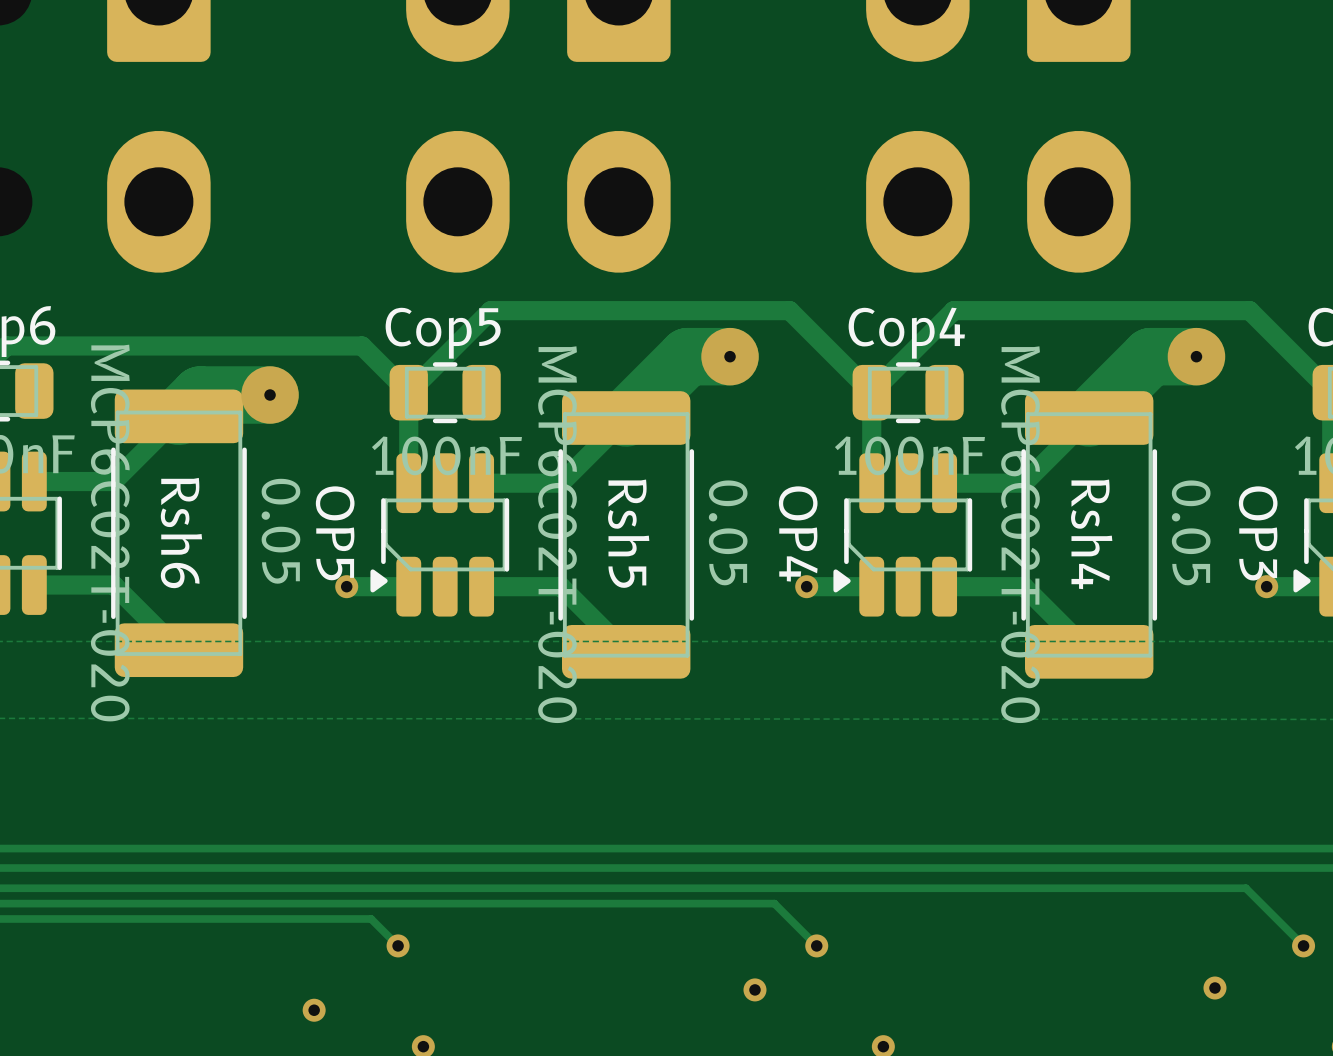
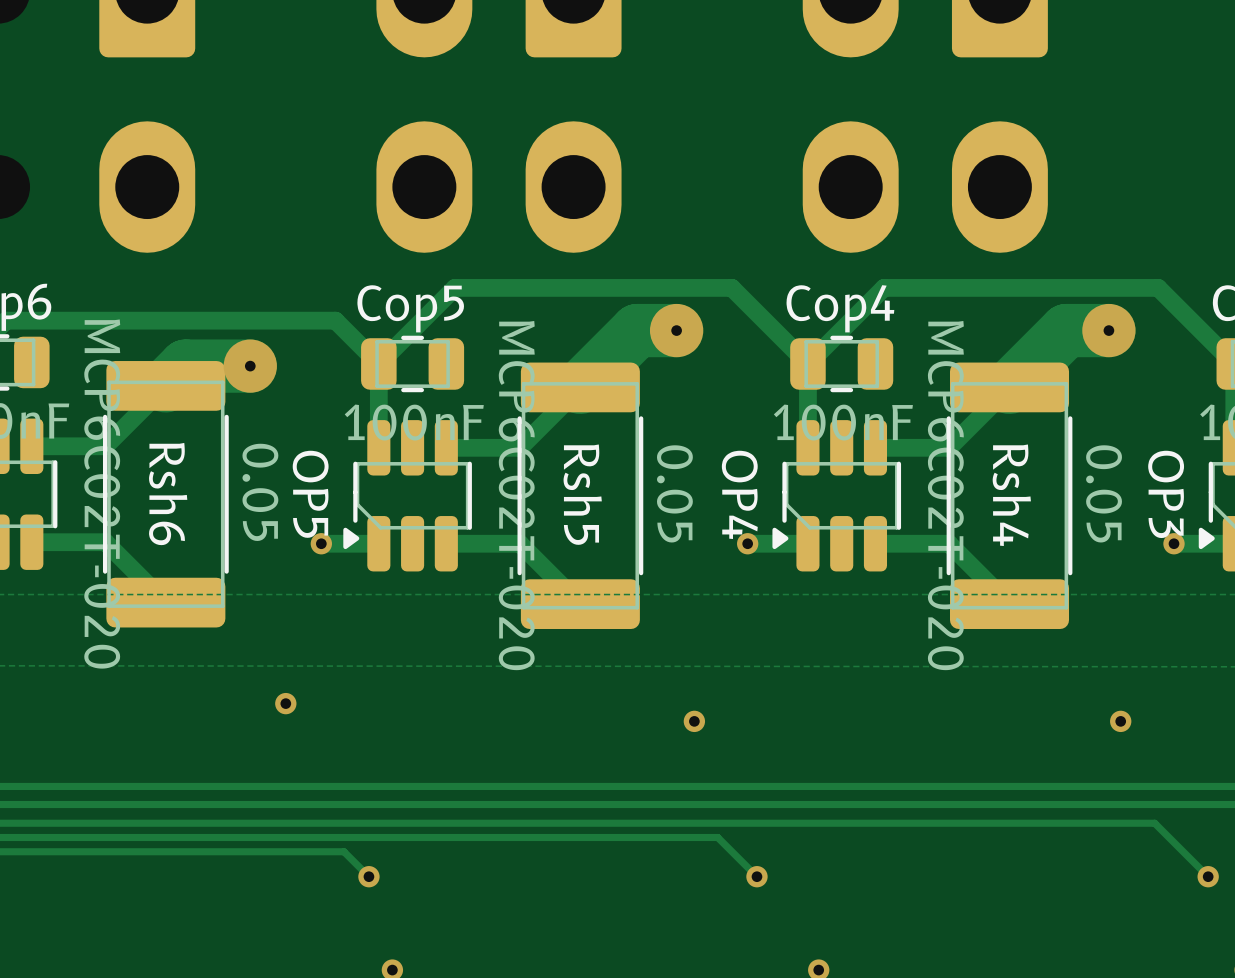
via: none -> (285, 703)
via position: (1214, 988) -> (1120, 721)
via position: (754, 989) -> (694, 721)
via: (314, 1010) -> none

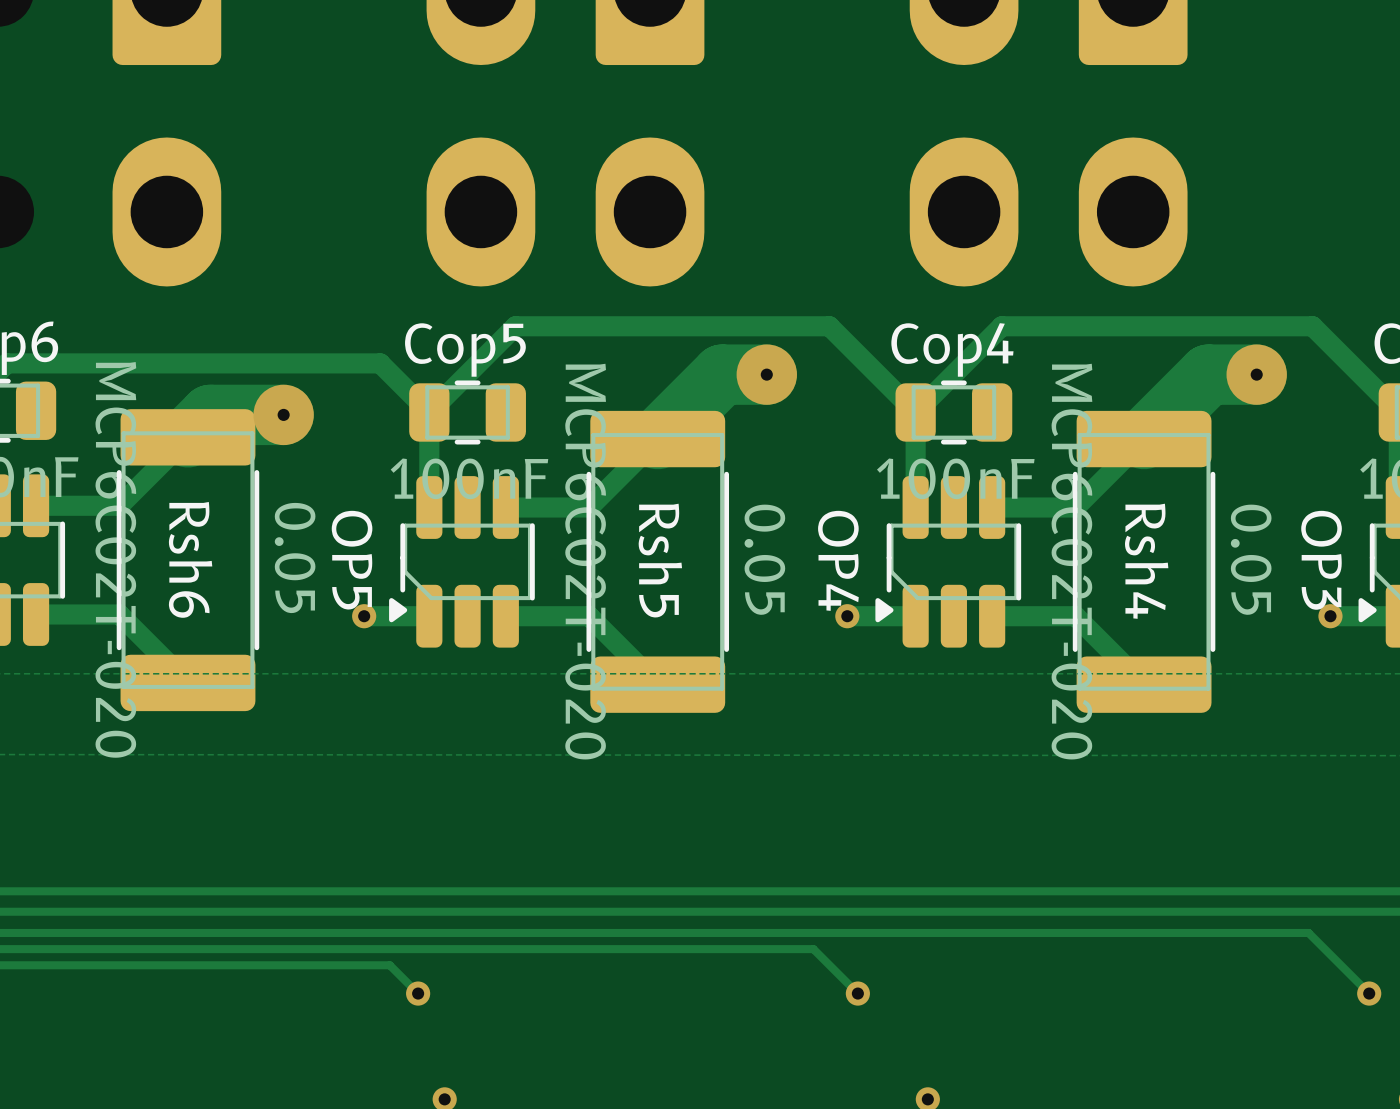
via: (285, 703) -> none
via: (694, 721) -> none
via: (1120, 721) -> none

